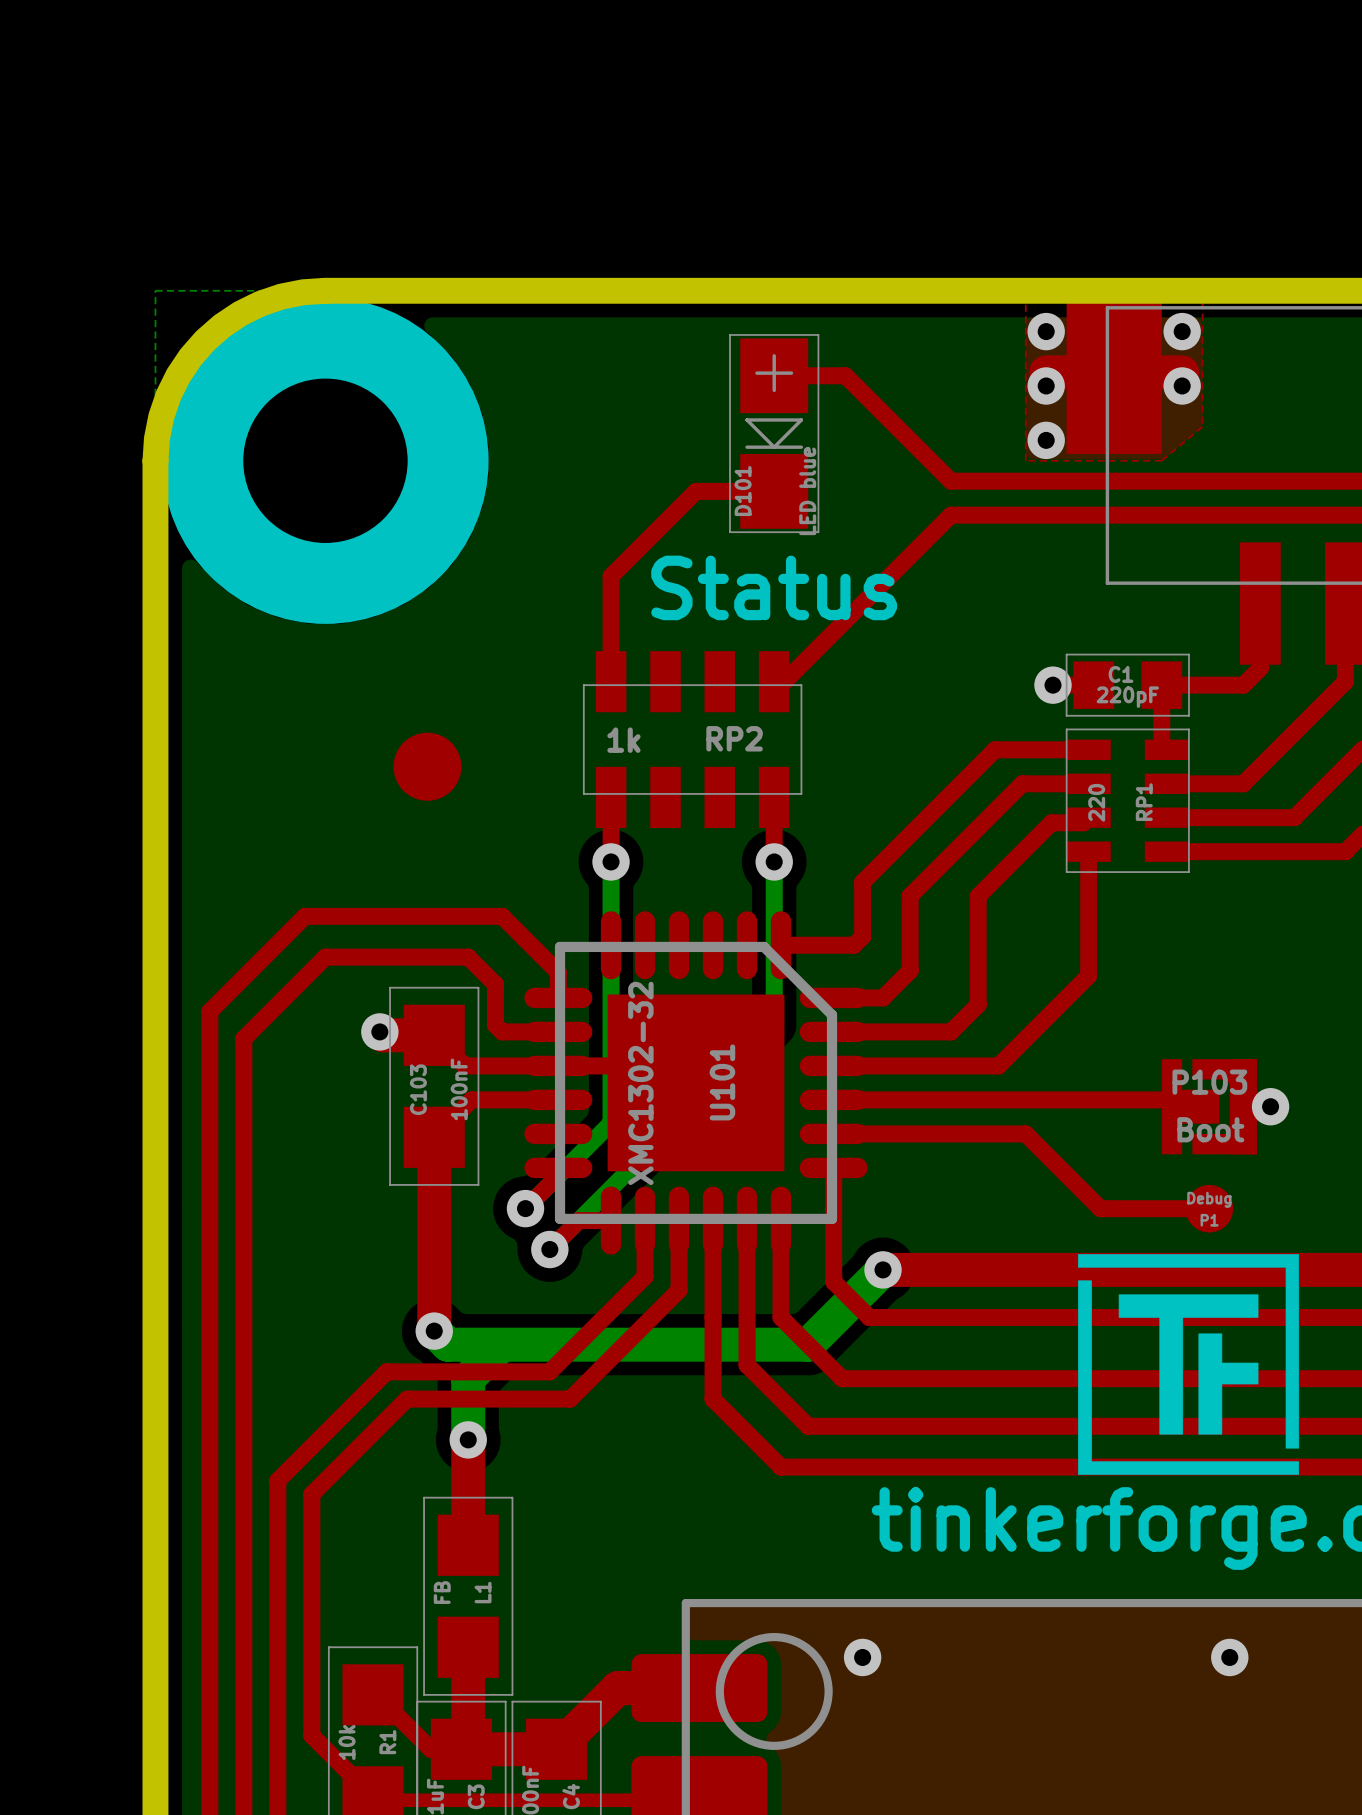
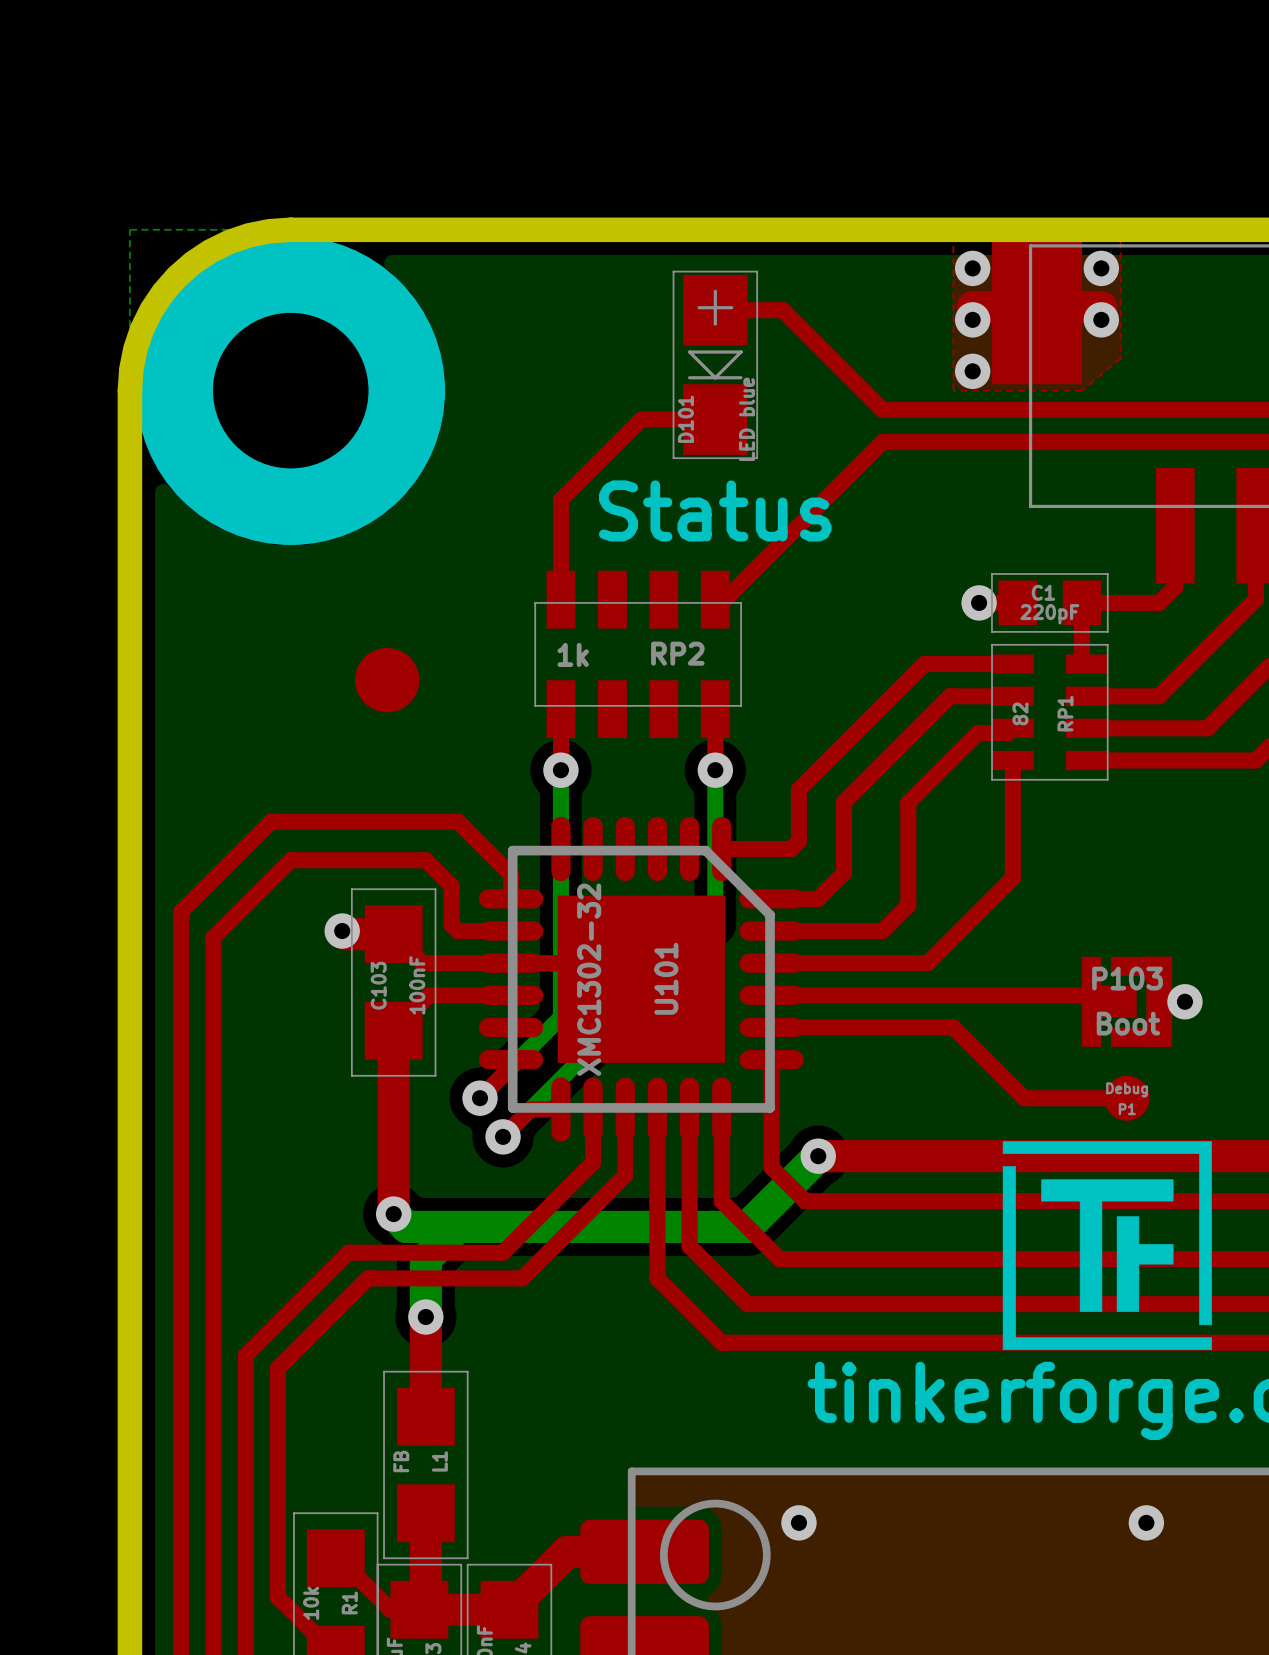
RP1 value: 220 (1096, 802) -> 82 (1020, 713)

